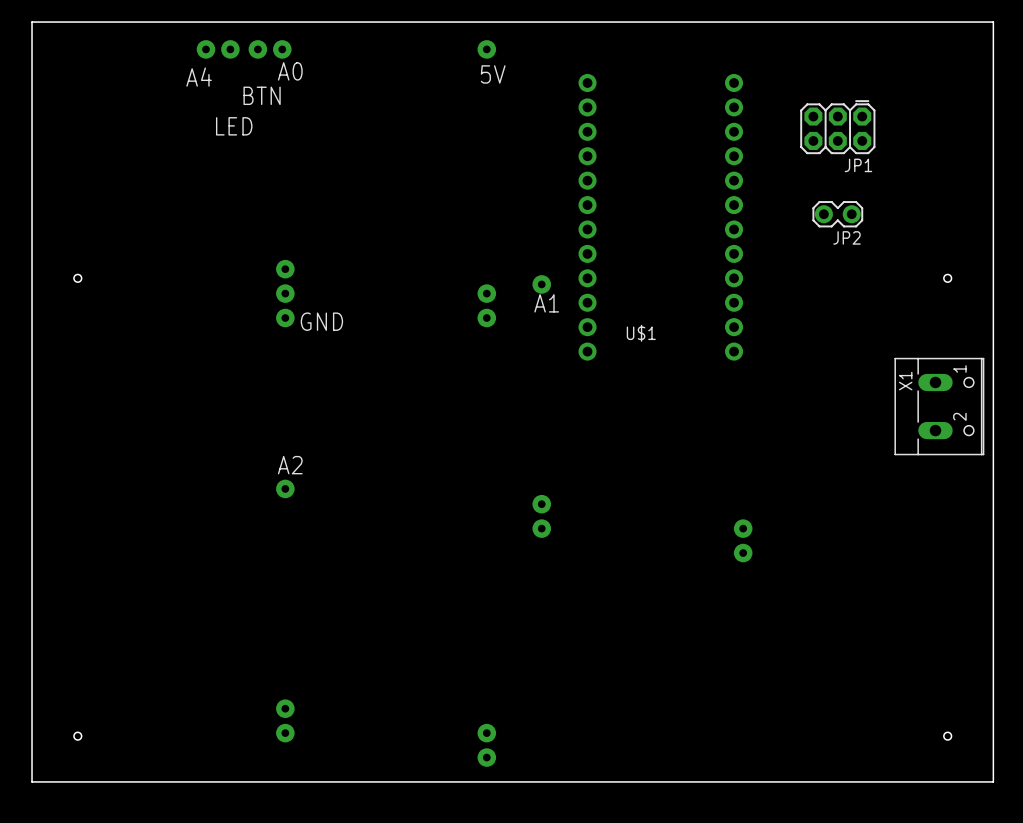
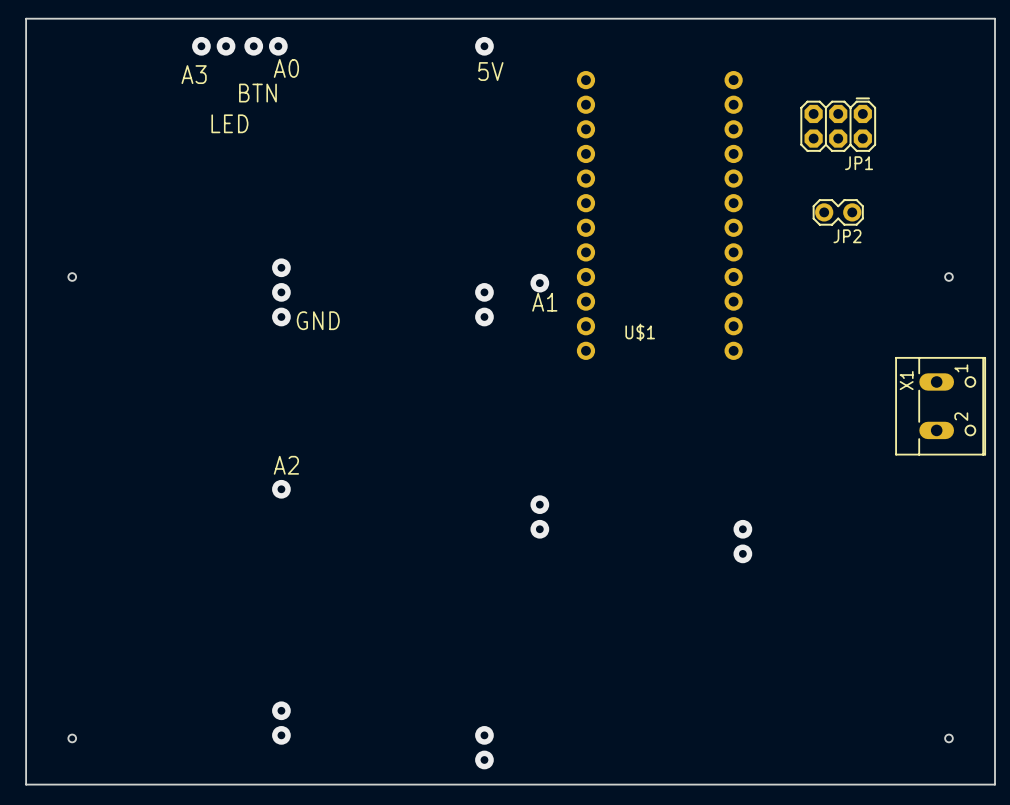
text: A4 (199, 77) -> A3 (194, 74)

